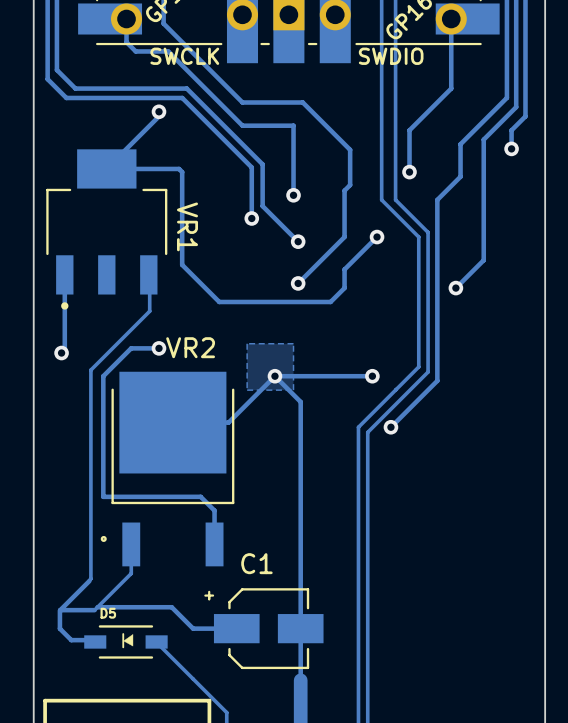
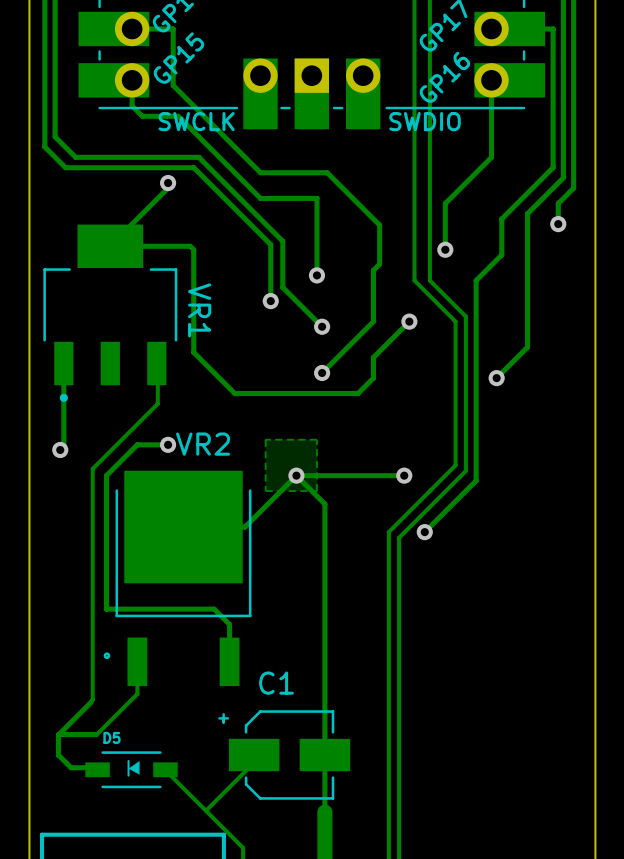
track: (97, 607) (171, 607) (193, 628) (236, 628) -> none
track: none -> (254, 762) (205, 810)

